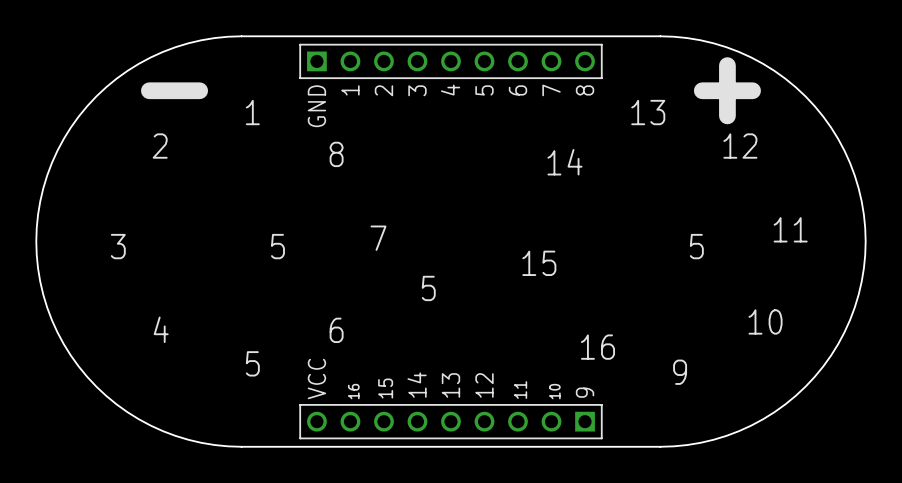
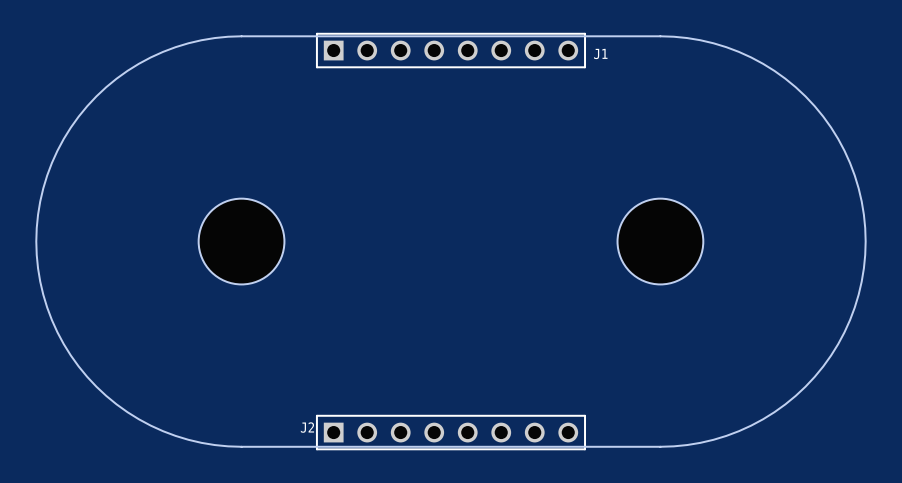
J1: none -> (450, 50)
part: (450, 61) -> none
line: (727, 65) (727, 115) -> none
line: (149, 90) (199, 90) -> none
text: 1 (350, 90) -> none
text: 2 (383, 90) -> none
text: 3 (417, 90) -> none
text: 4 (450, 90) -> none
text: 5 (484, 90) -> none
text: 6 (518, 90) -> none
text: 7 (551, 90) -> none
text: 8 (585, 90) -> none
line: (702, 90) (752, 90) -> none
text: GND (316, 106) -> none
text: 1 (252, 112) -> none
text: 13 (648, 112) -> none
text: 2 (160, 146) -> none
text: 12 (740, 146) -> none
text: 8 (336, 154) -> none
text: 14 (564, 162) -> none
text: 11 (790, 229) -> none
text: 7 (378, 238) -> none
hole: none -> (241, 241)
hole: none -> (660, 241)
text: 3 (118, 246) -> none
text: 5 (277, 246) -> none
text: 5 (696, 246) -> none
text: 15 (539, 263) -> none
text: 5 (428, 288) -> none
text: 10 (765, 321) -> none
text: 4 (161, 329) -> none
text: 6 (336, 330) -> none
text: 16 (597, 347) -> none
text: 5 (252, 363) -> none
text: 9 (680, 372) -> none
text: VCC (316, 379) -> none
text: 14 (417, 385) -> none
text: 13 (450, 385) -> none
text: 12 (484, 385) -> none
text: 15 (385, 388) -> none
text: 11 (520, 390) -> none
text: 16 (353, 391) -> none
text: 10 (554, 391) -> none
text: 9 (585, 392) -> none
part: (450, 421) -> none
J2: none -> (450, 432)

